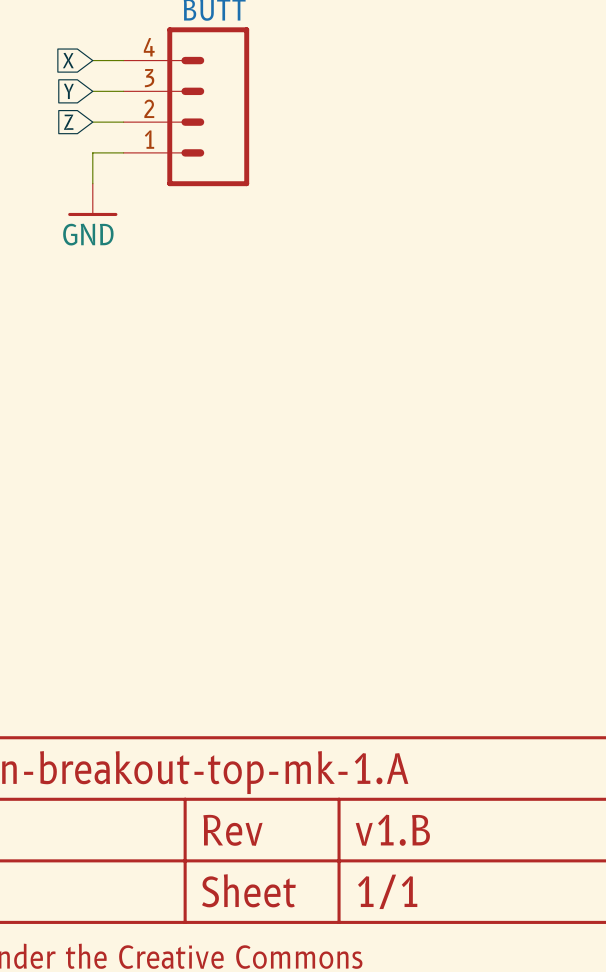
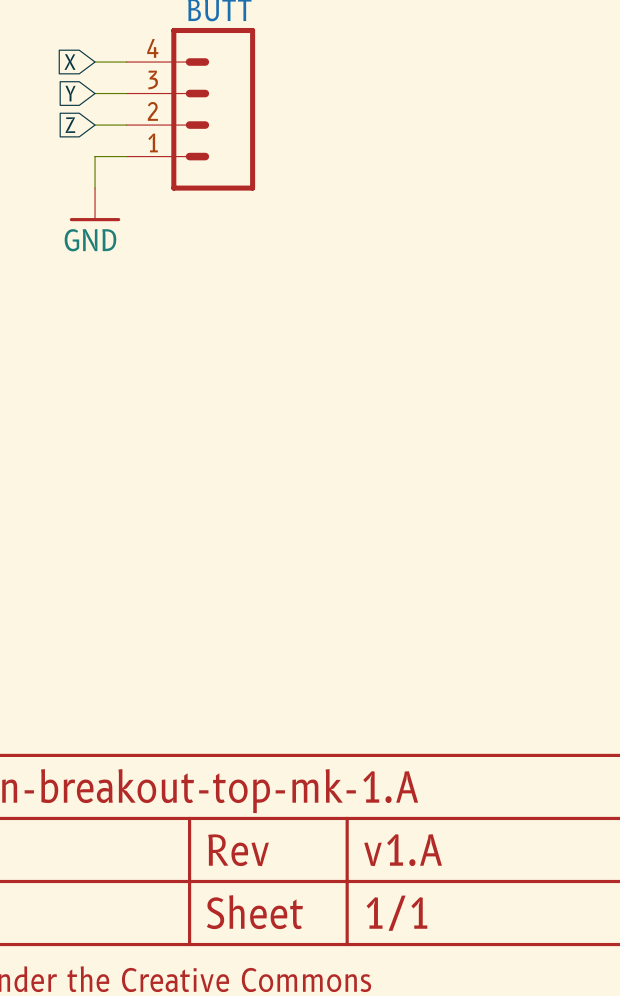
part text: v1.B (392, 830) -> v1.A (403, 850)

